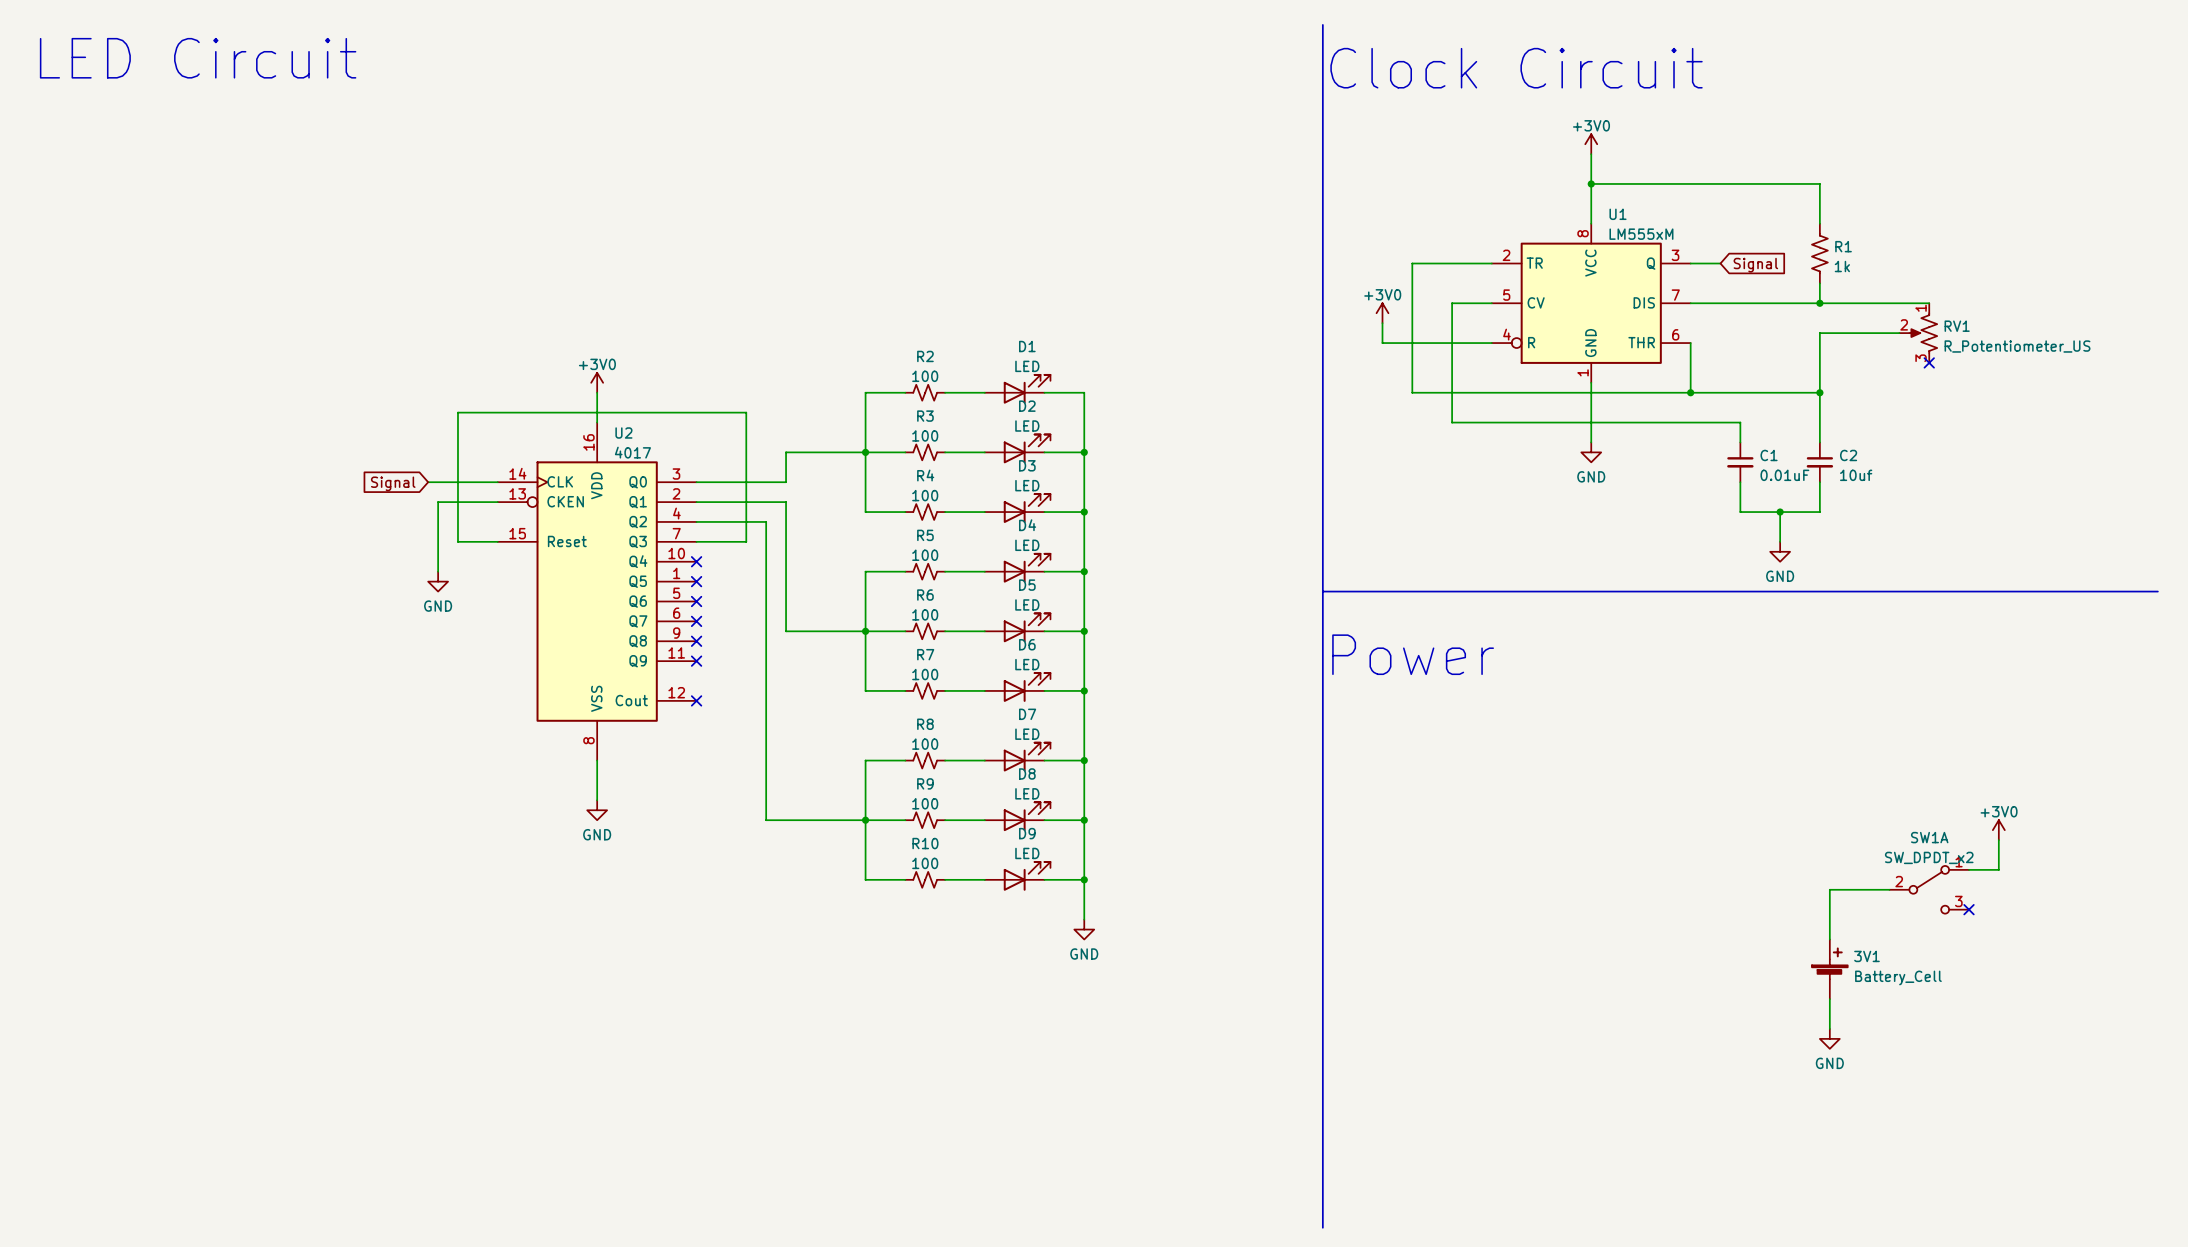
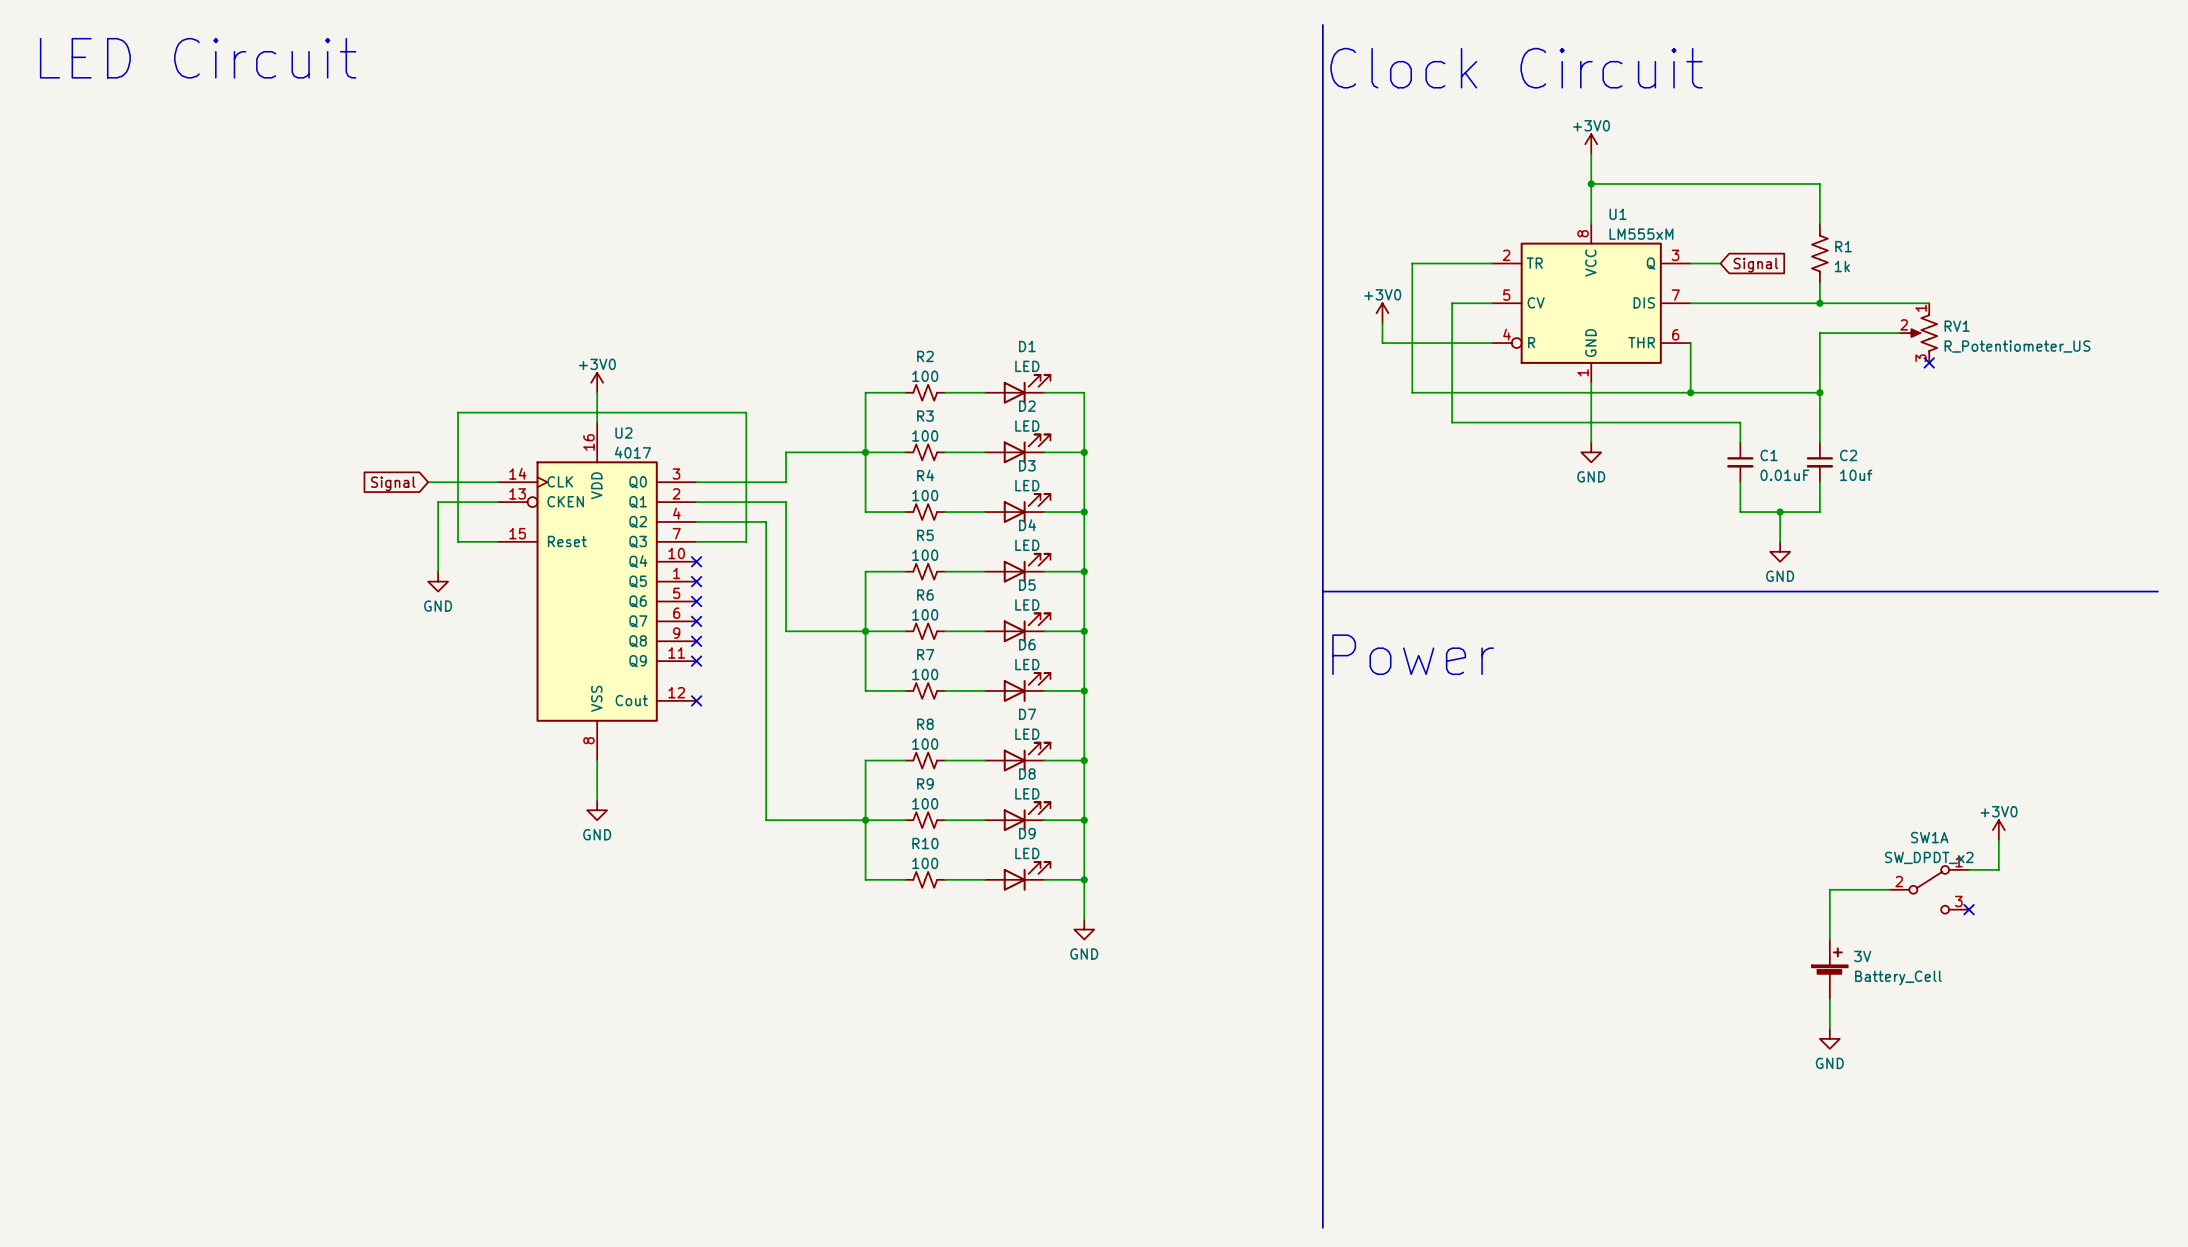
3V1 name: 3V1 (1866, 956) -> 3V (1862, 956)

